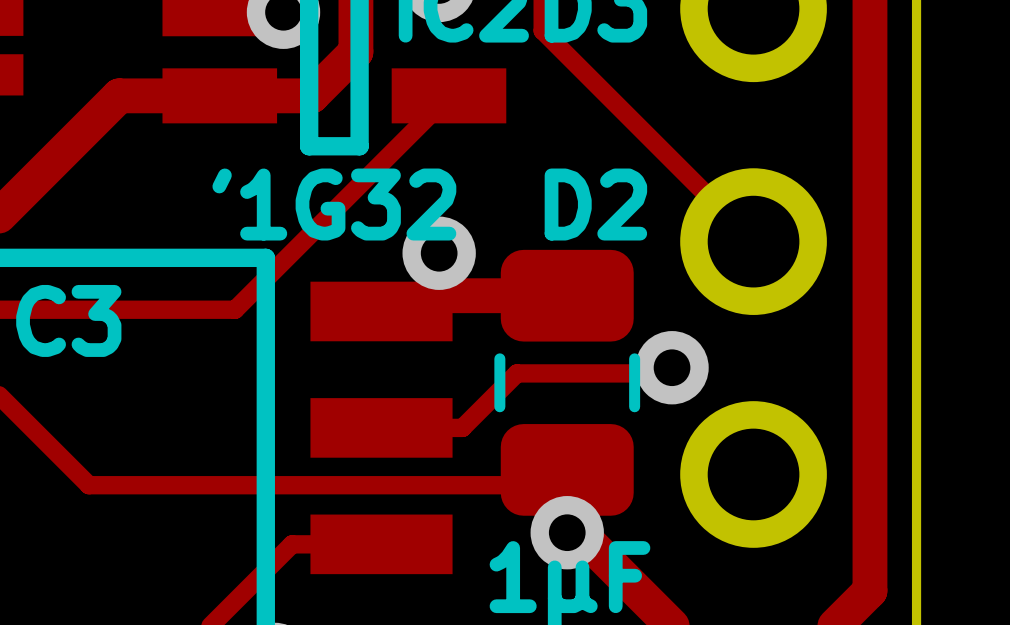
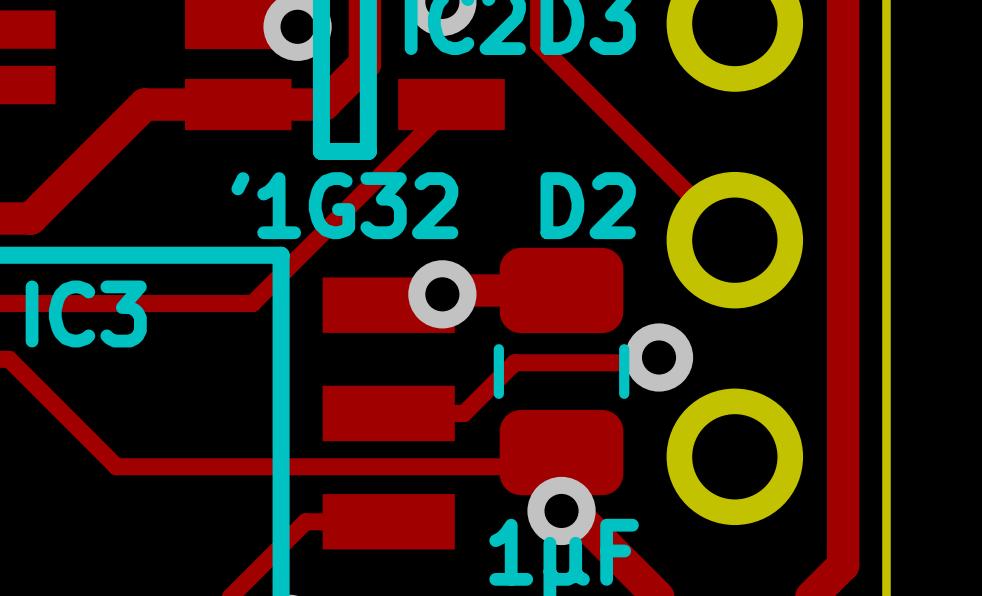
via position: (439, 253) -> (442, 294)

